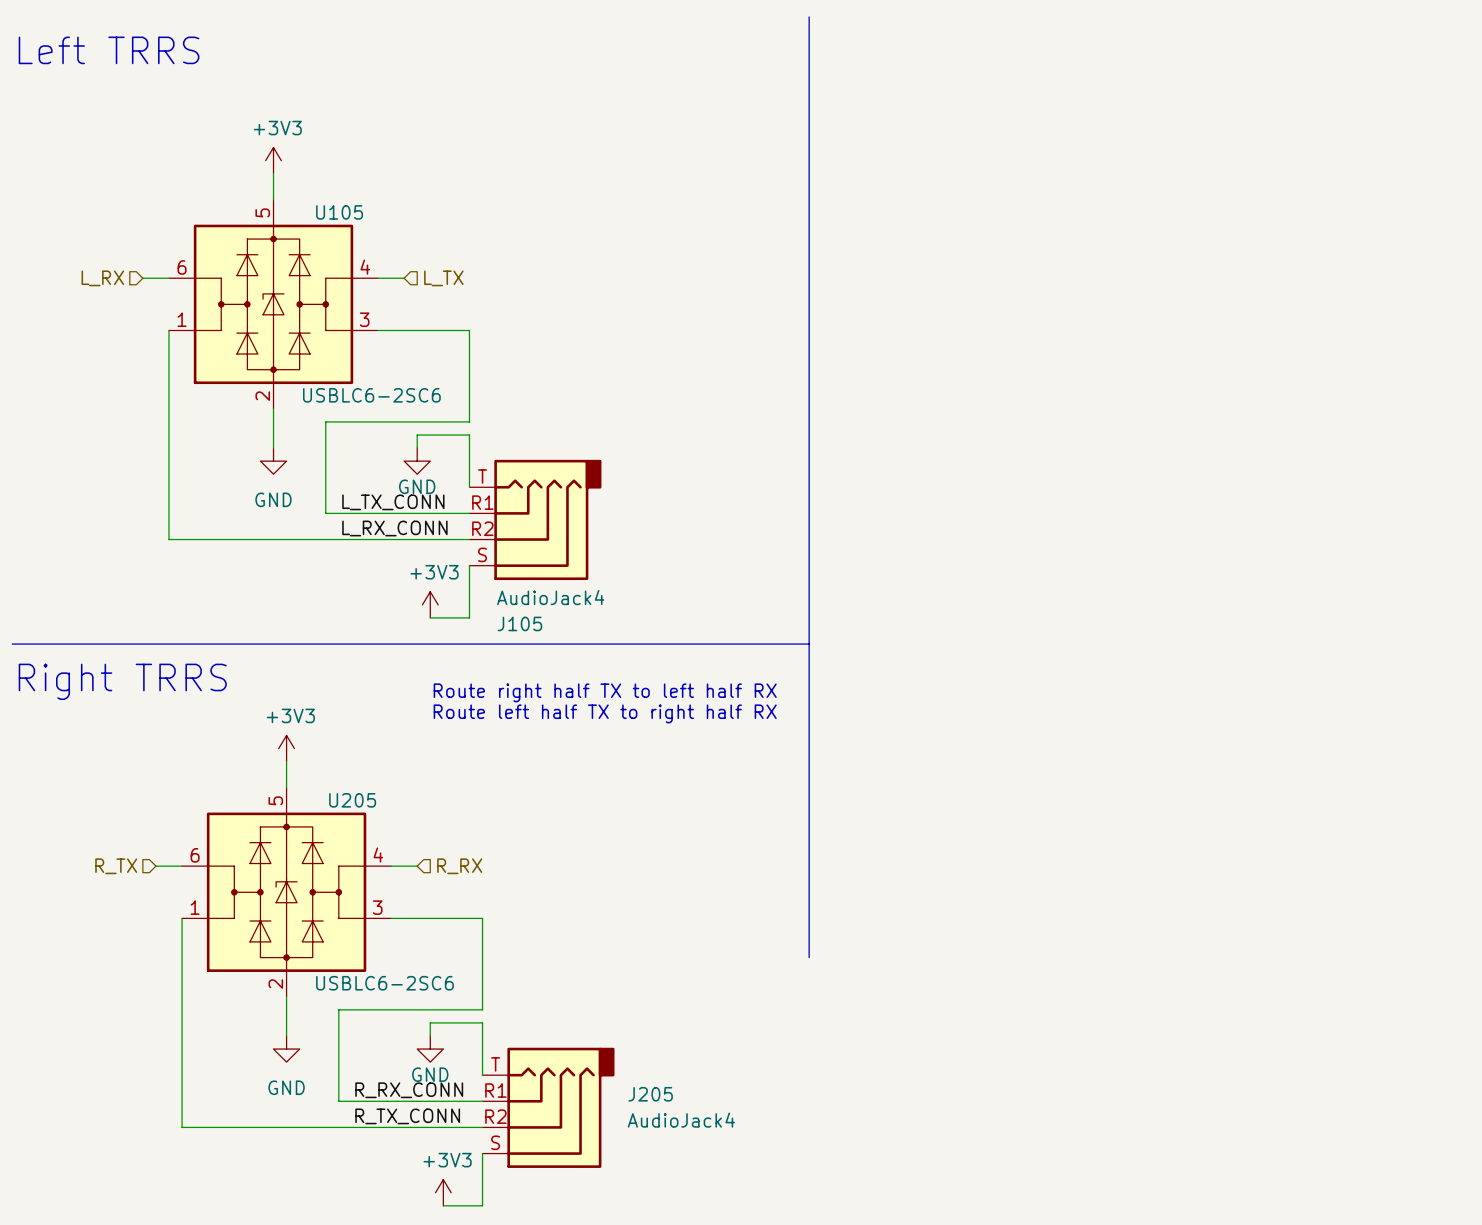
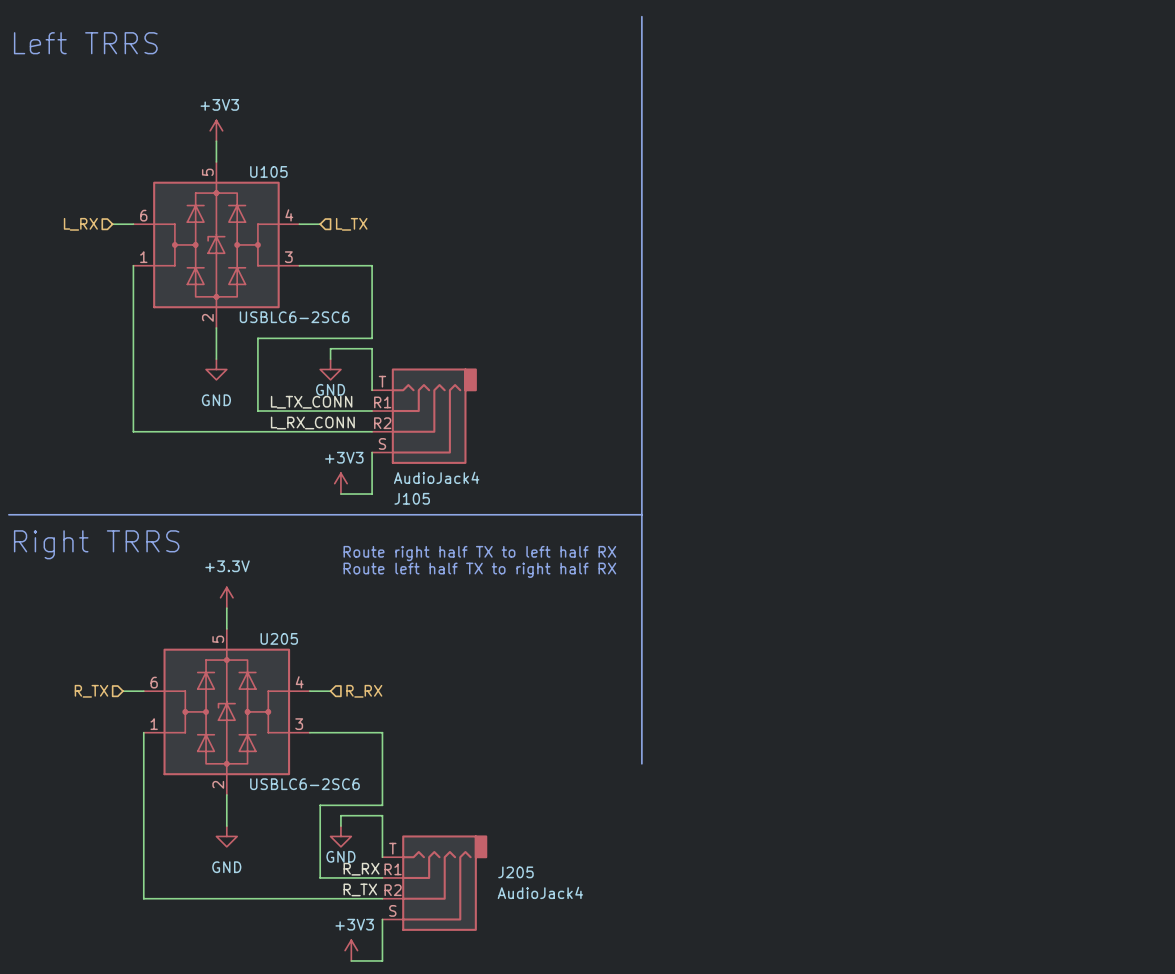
power symbol: +3V3 (286, 748) -> +3.3V (226, 597)
wire: (404, 1009) (338, 1009) (338, 1101) (404, 1101) -> (320, 805) (320, 877)
label: R_RX_CONN (409, 1090) -> R_RX (361, 869)
label: R_TX_CONN (407, 1116) -> R_TX (360, 889)

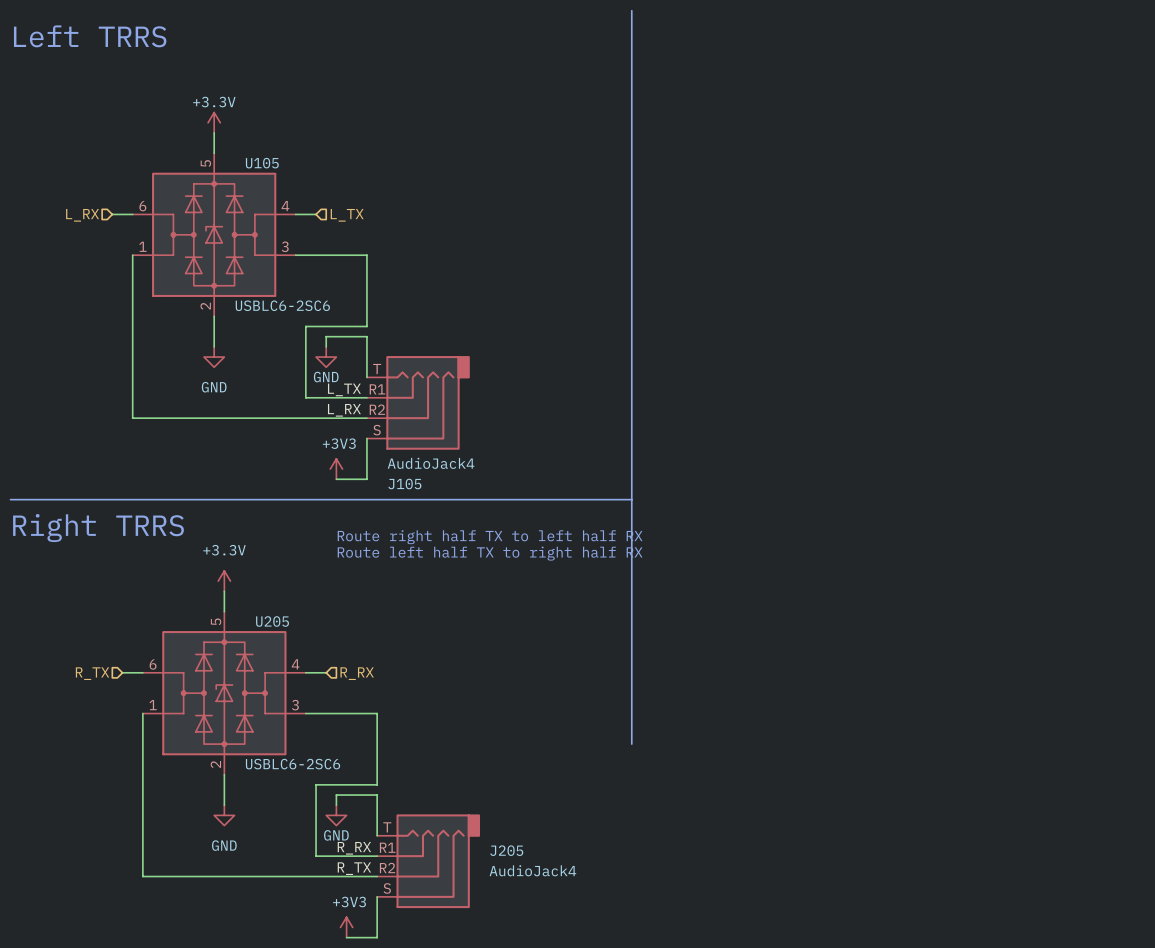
power symbol: +3V3 (216, 130) -> +3.3V (214, 122)
wire: (309, 338) (257, 338) (257, 411) (309, 411) -> (305, 326) (305, 397)
label: L_TX_CONN (311, 402) -> L_TX (344, 389)
label: L_RX_CONN (312, 422) -> L_RX (344, 410)

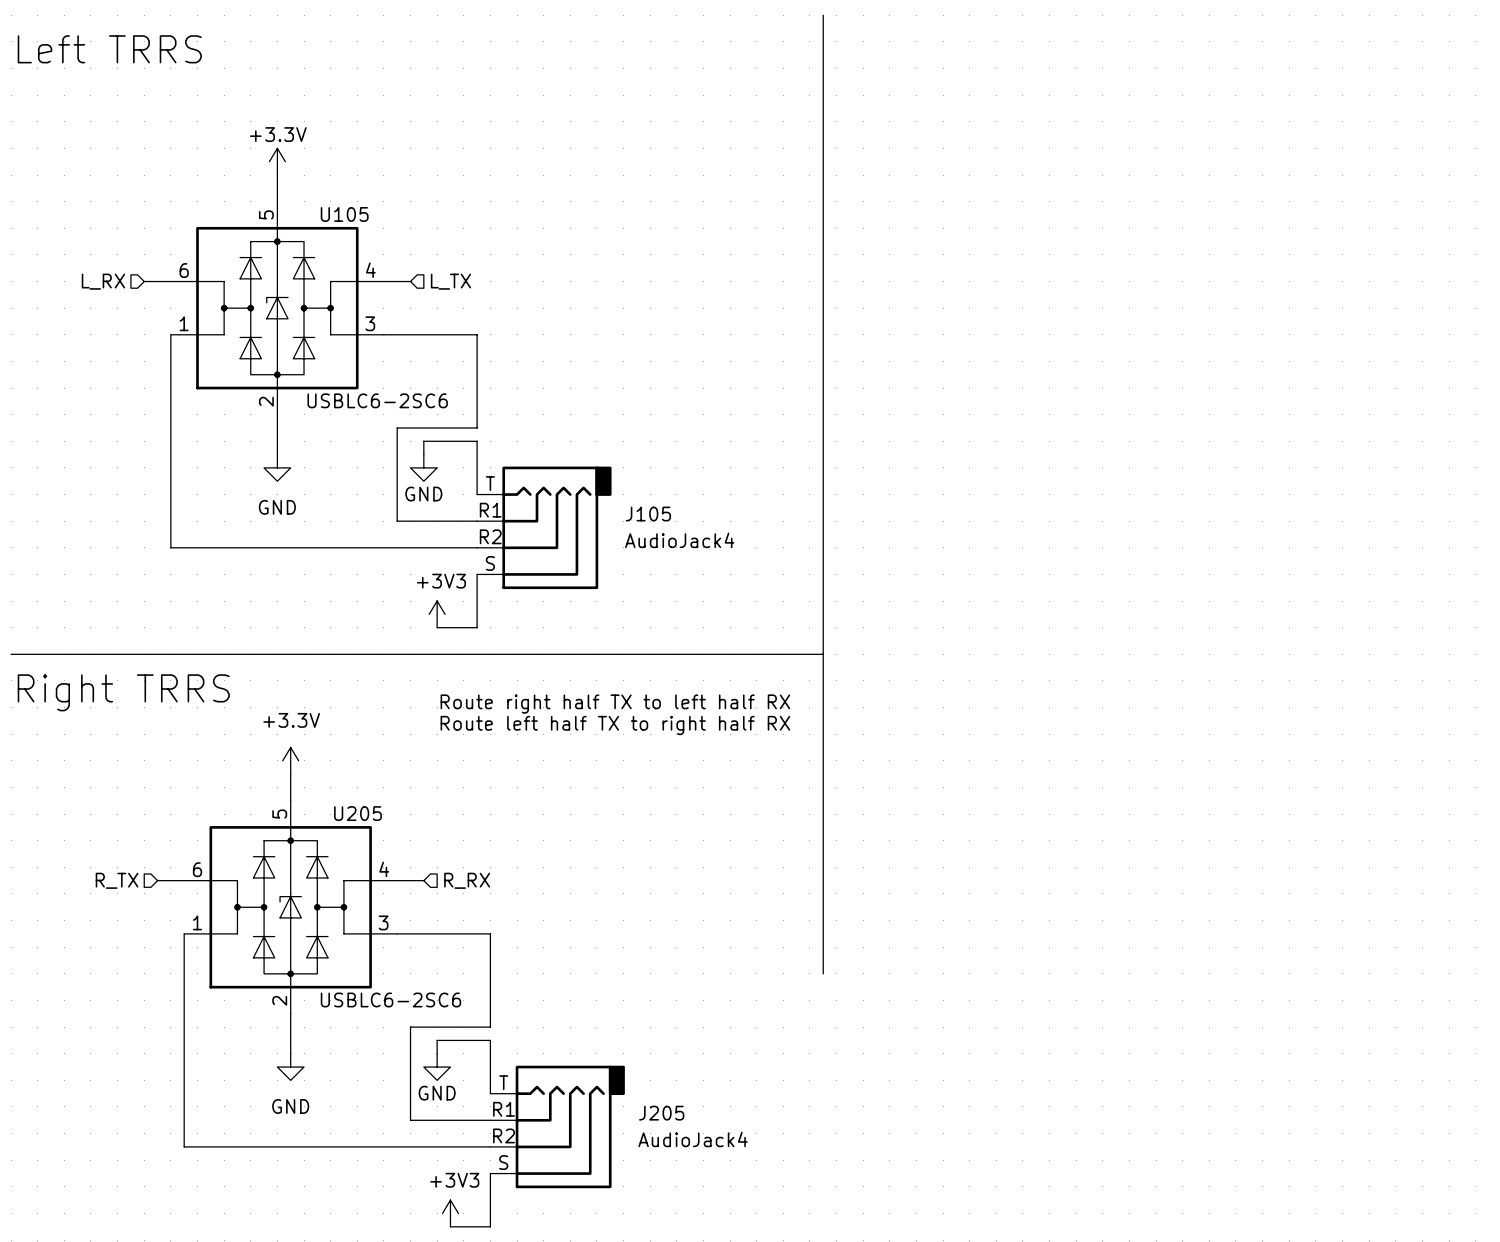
label: L_TX (344, 389) -> none
label: L_RX (344, 410) -> none
J105 value position: AudioJack4 (431, 463) -> AudioJack4 (679, 540)
J105 name position: J105 (404, 483) -> J105 (648, 514)
label: R_RX (354, 848) -> none
label: R_TX (354, 868) -> none

